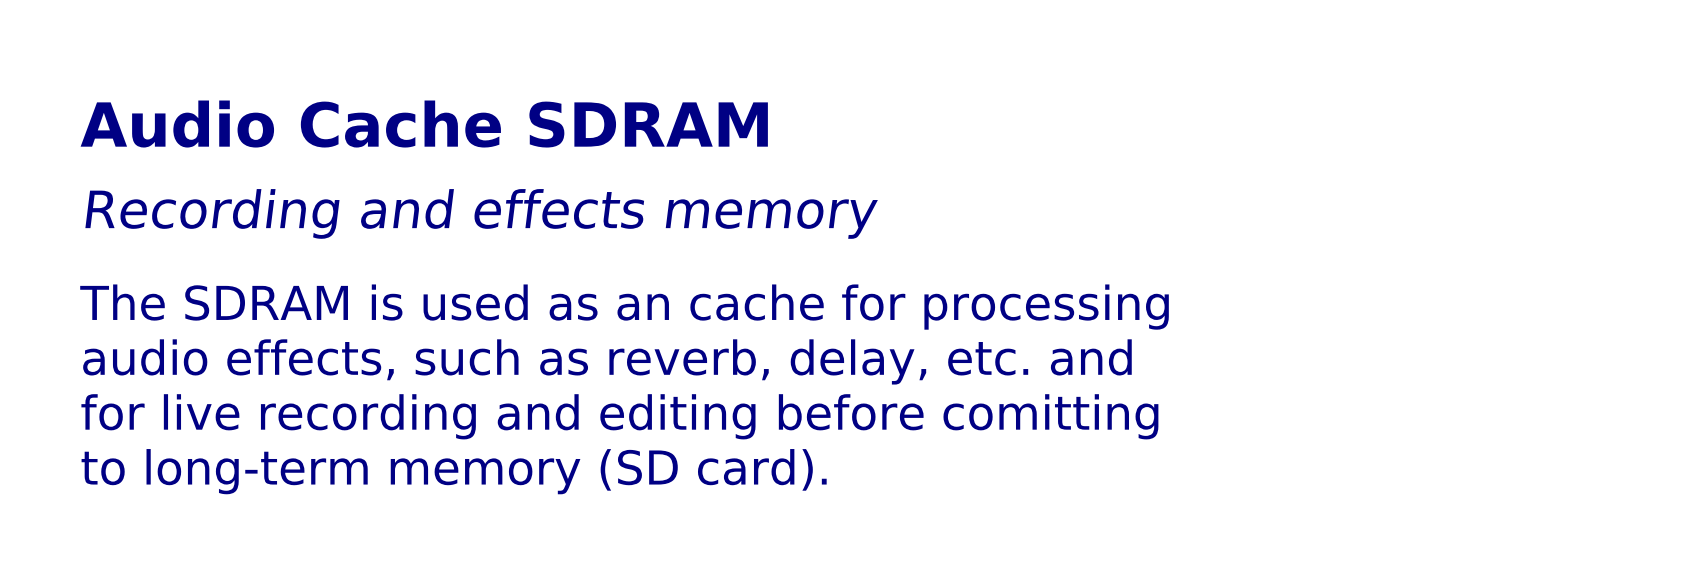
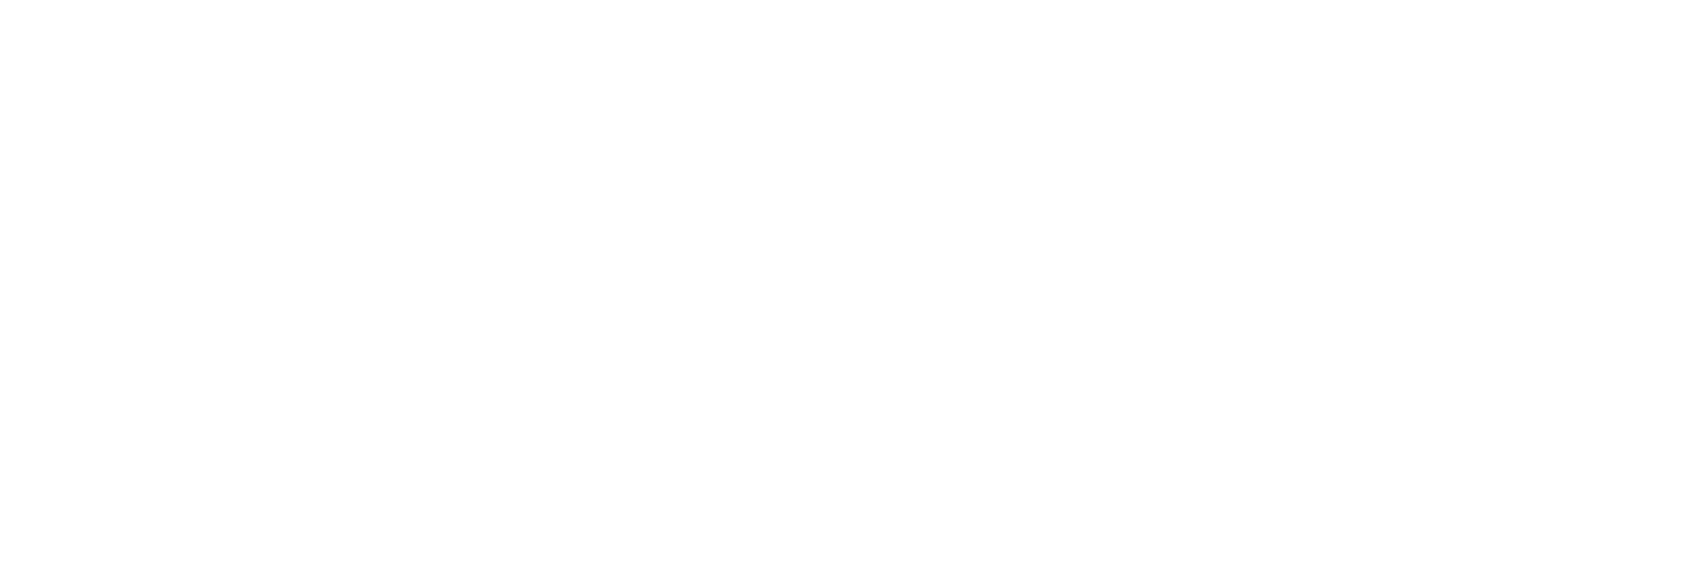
text: Audio Cache SDRAM (424, 124) -> none
text: Recording and effects memory (481, 213) -> none
text: The SDRAM is used as an cache for processing (624, 307) -> none
text: audio effects, such as reverb, delay, etc. and (607, 361) -> none
text: for live recording and editing before comitting (619, 416) -> none
text: to long-term memory (SD card). (454, 471) -> none

